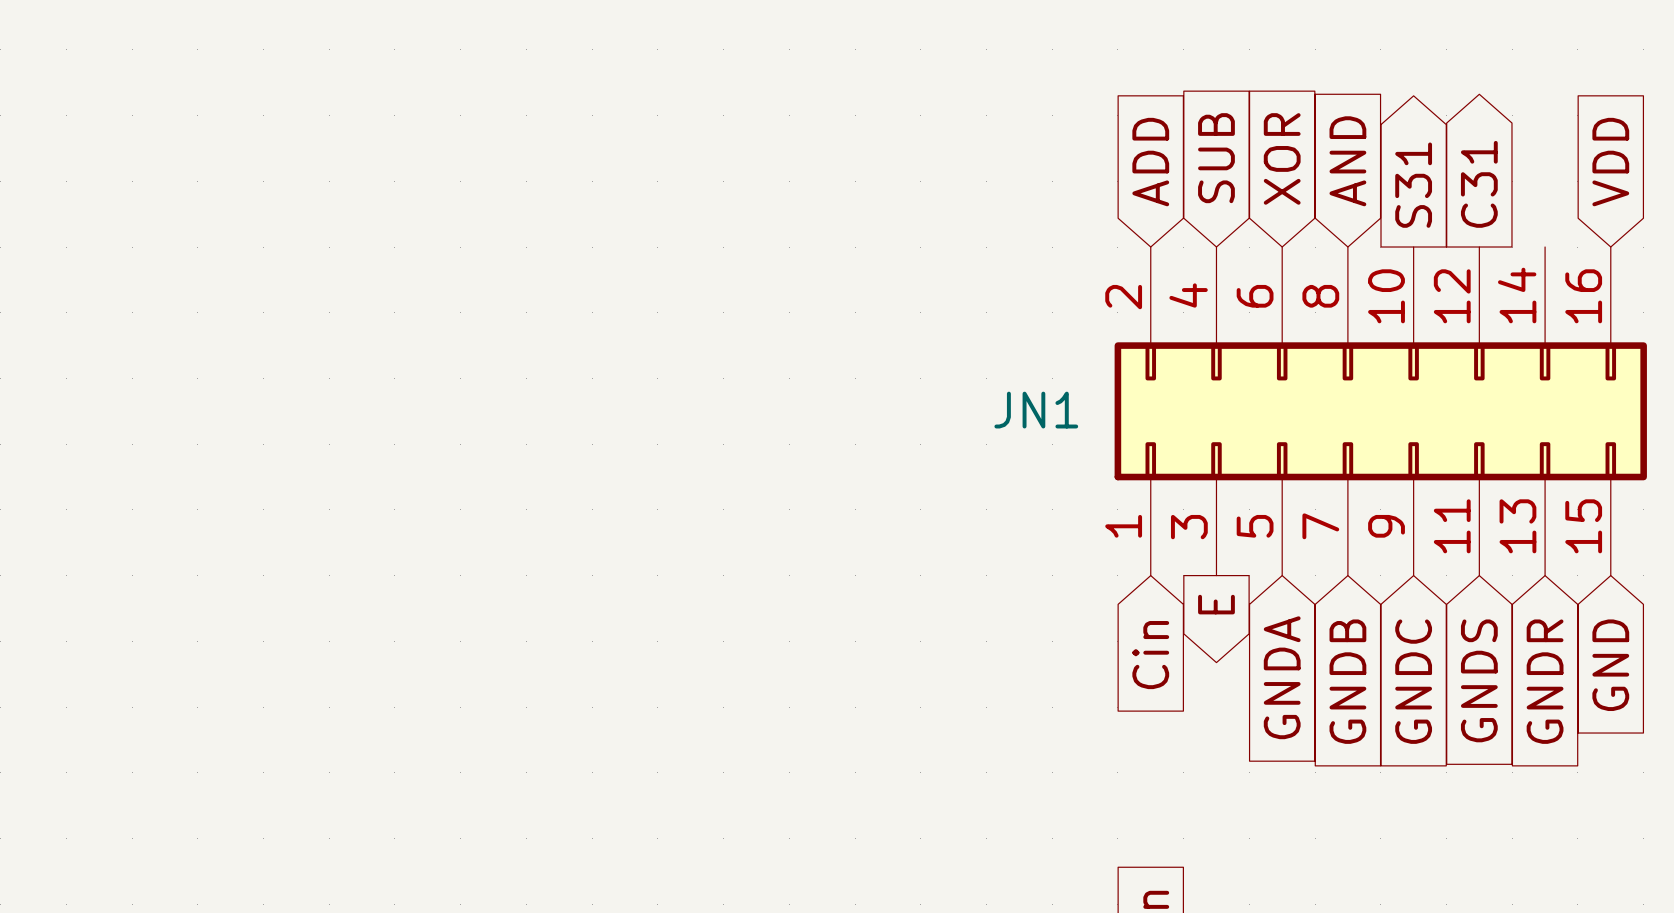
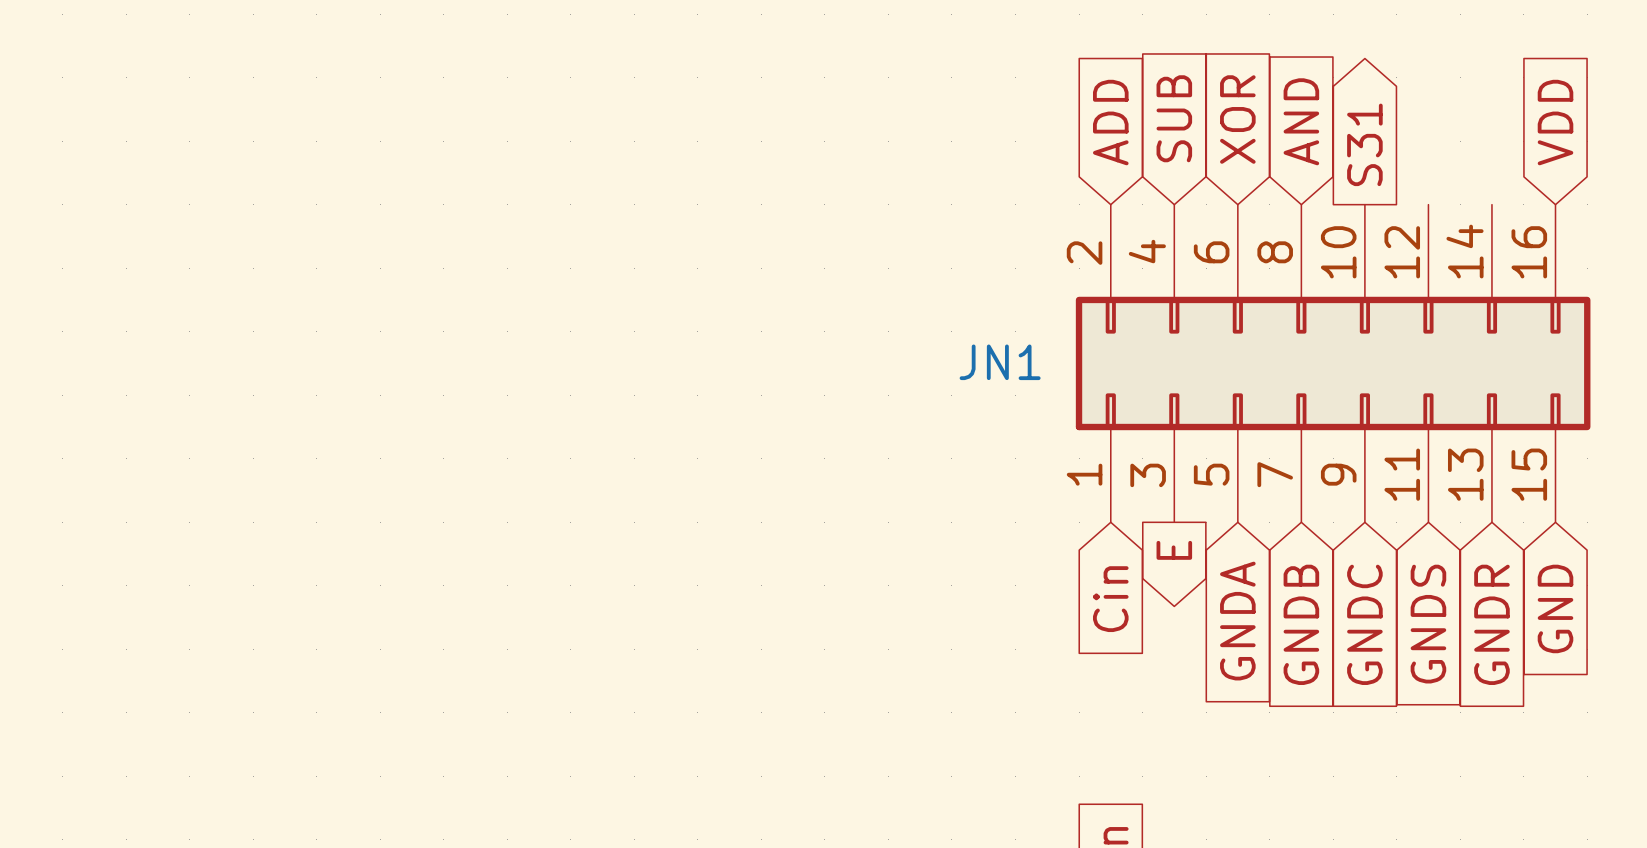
global label: C31 (1479, 184) -> none

